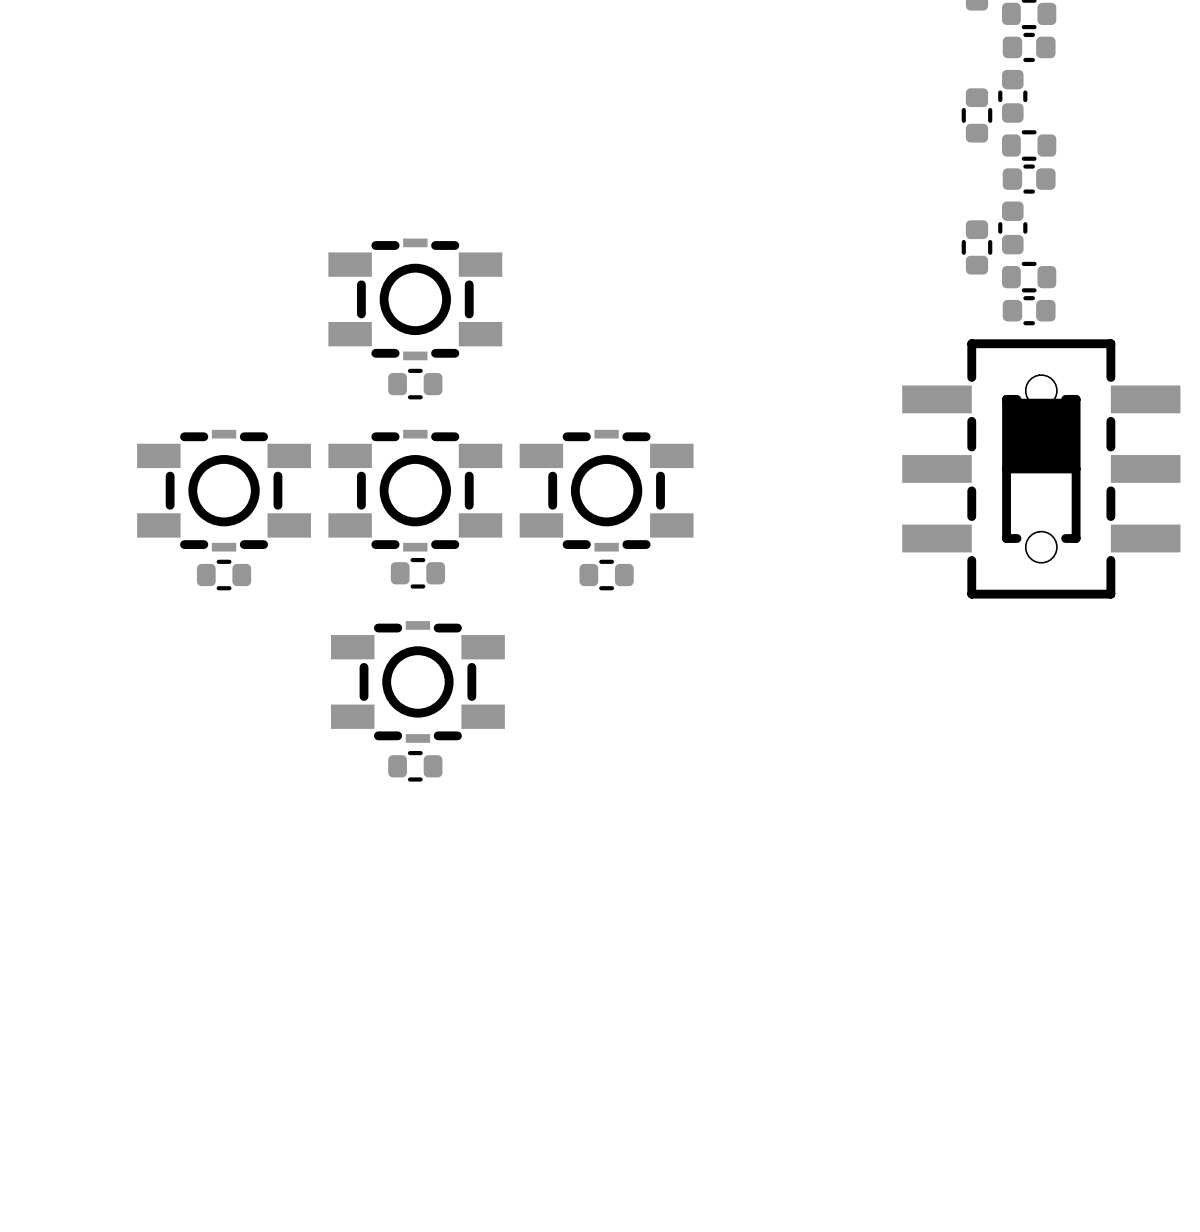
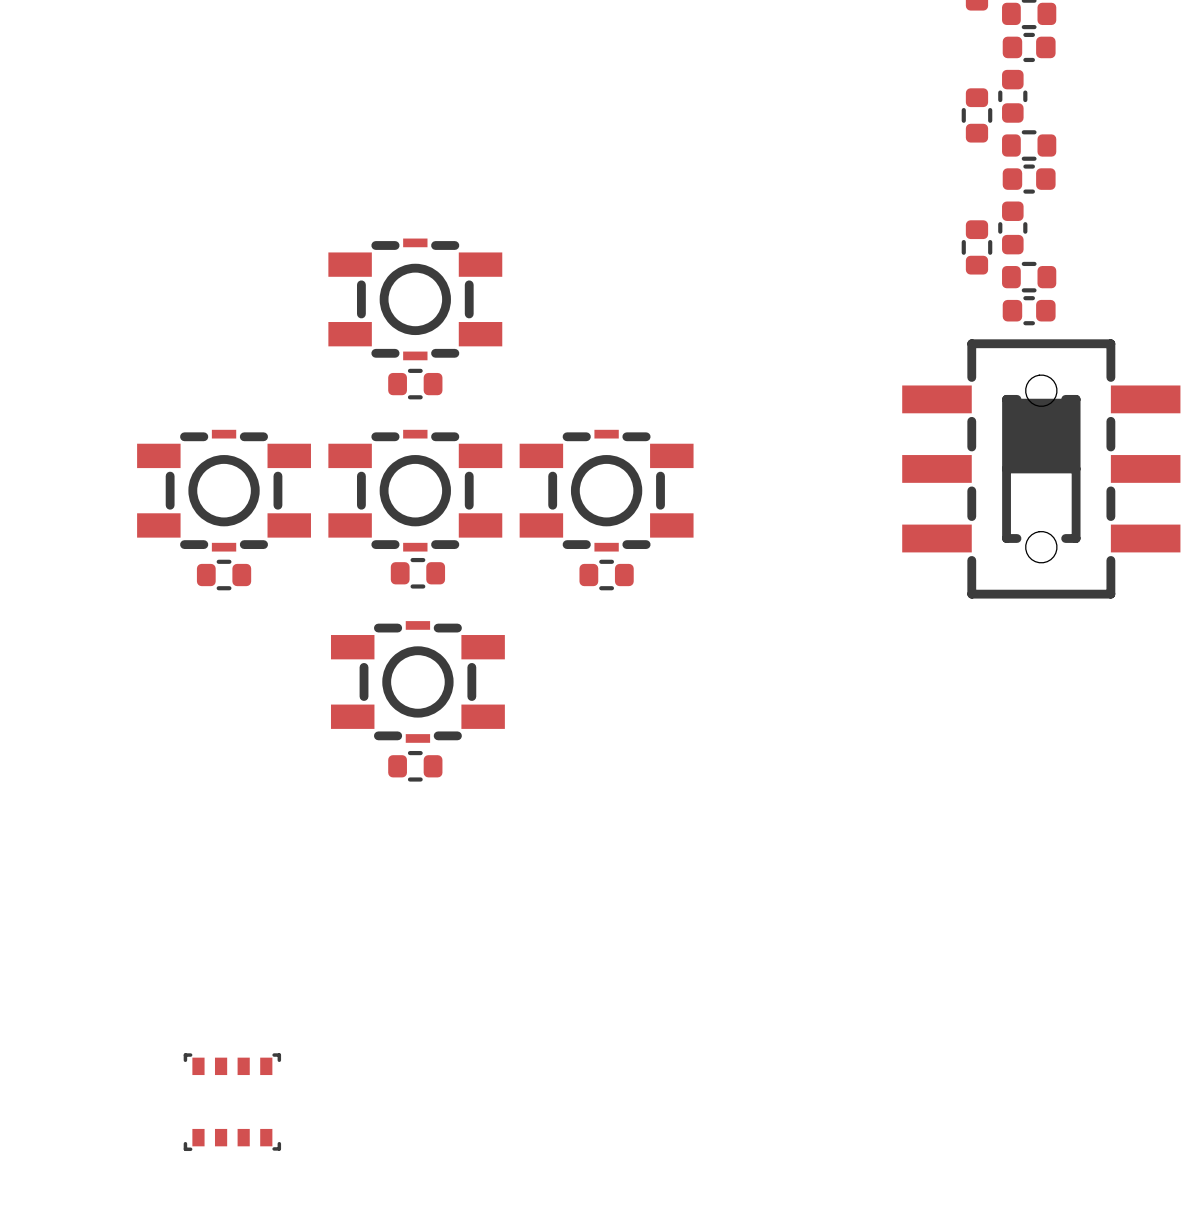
part: none -> (232, 1102)

